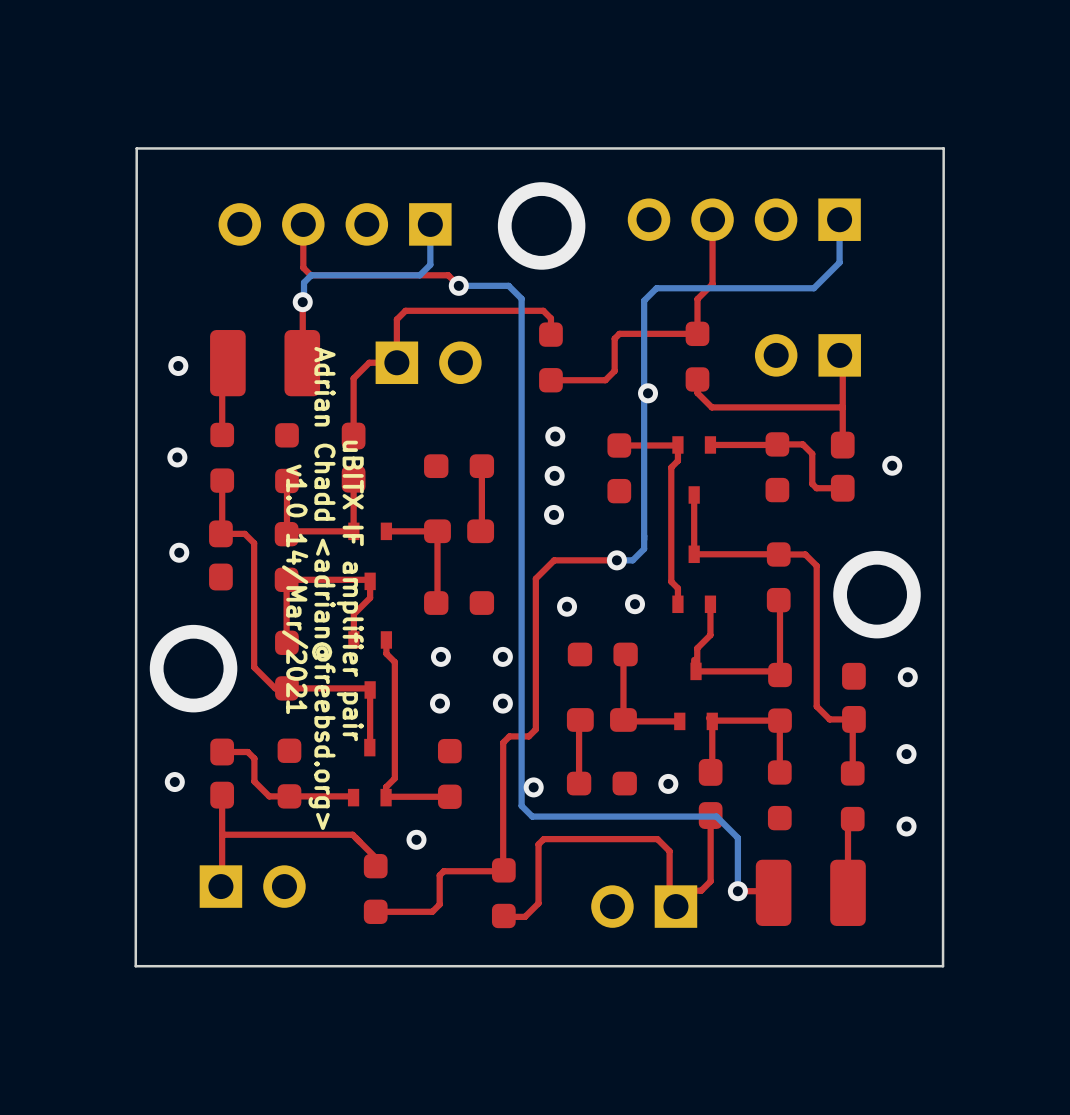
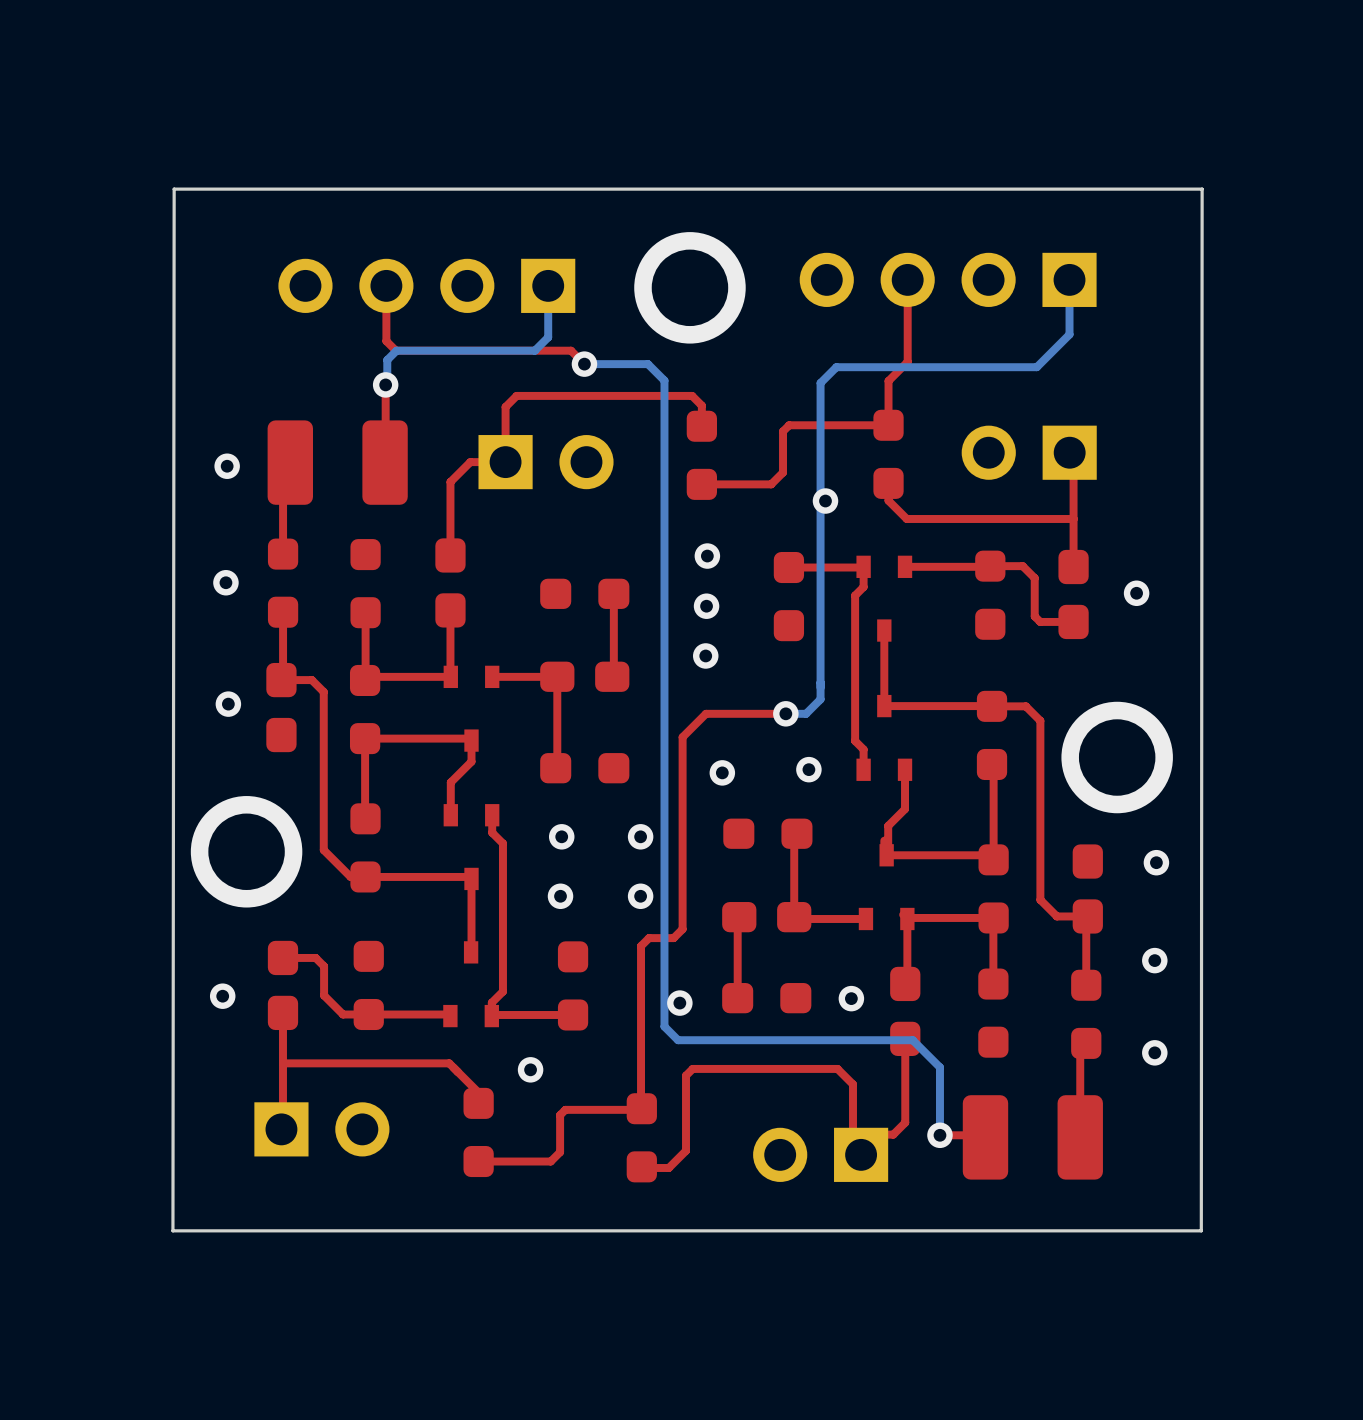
text: Adrian Chadd <adrian@freebsd.org> (322, 588) -> none
text: v1.0 14/Mar/2021 (295, 589) -> none
text: uBITX IF amplifier pair (350, 590) -> none

